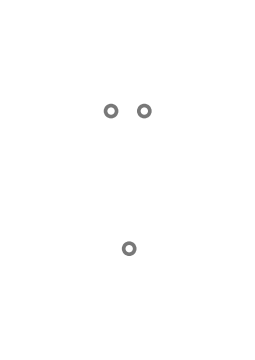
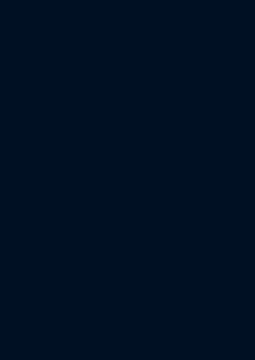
via: (111, 111) -> none
via: (144, 111) -> none
via: (129, 248) -> none

